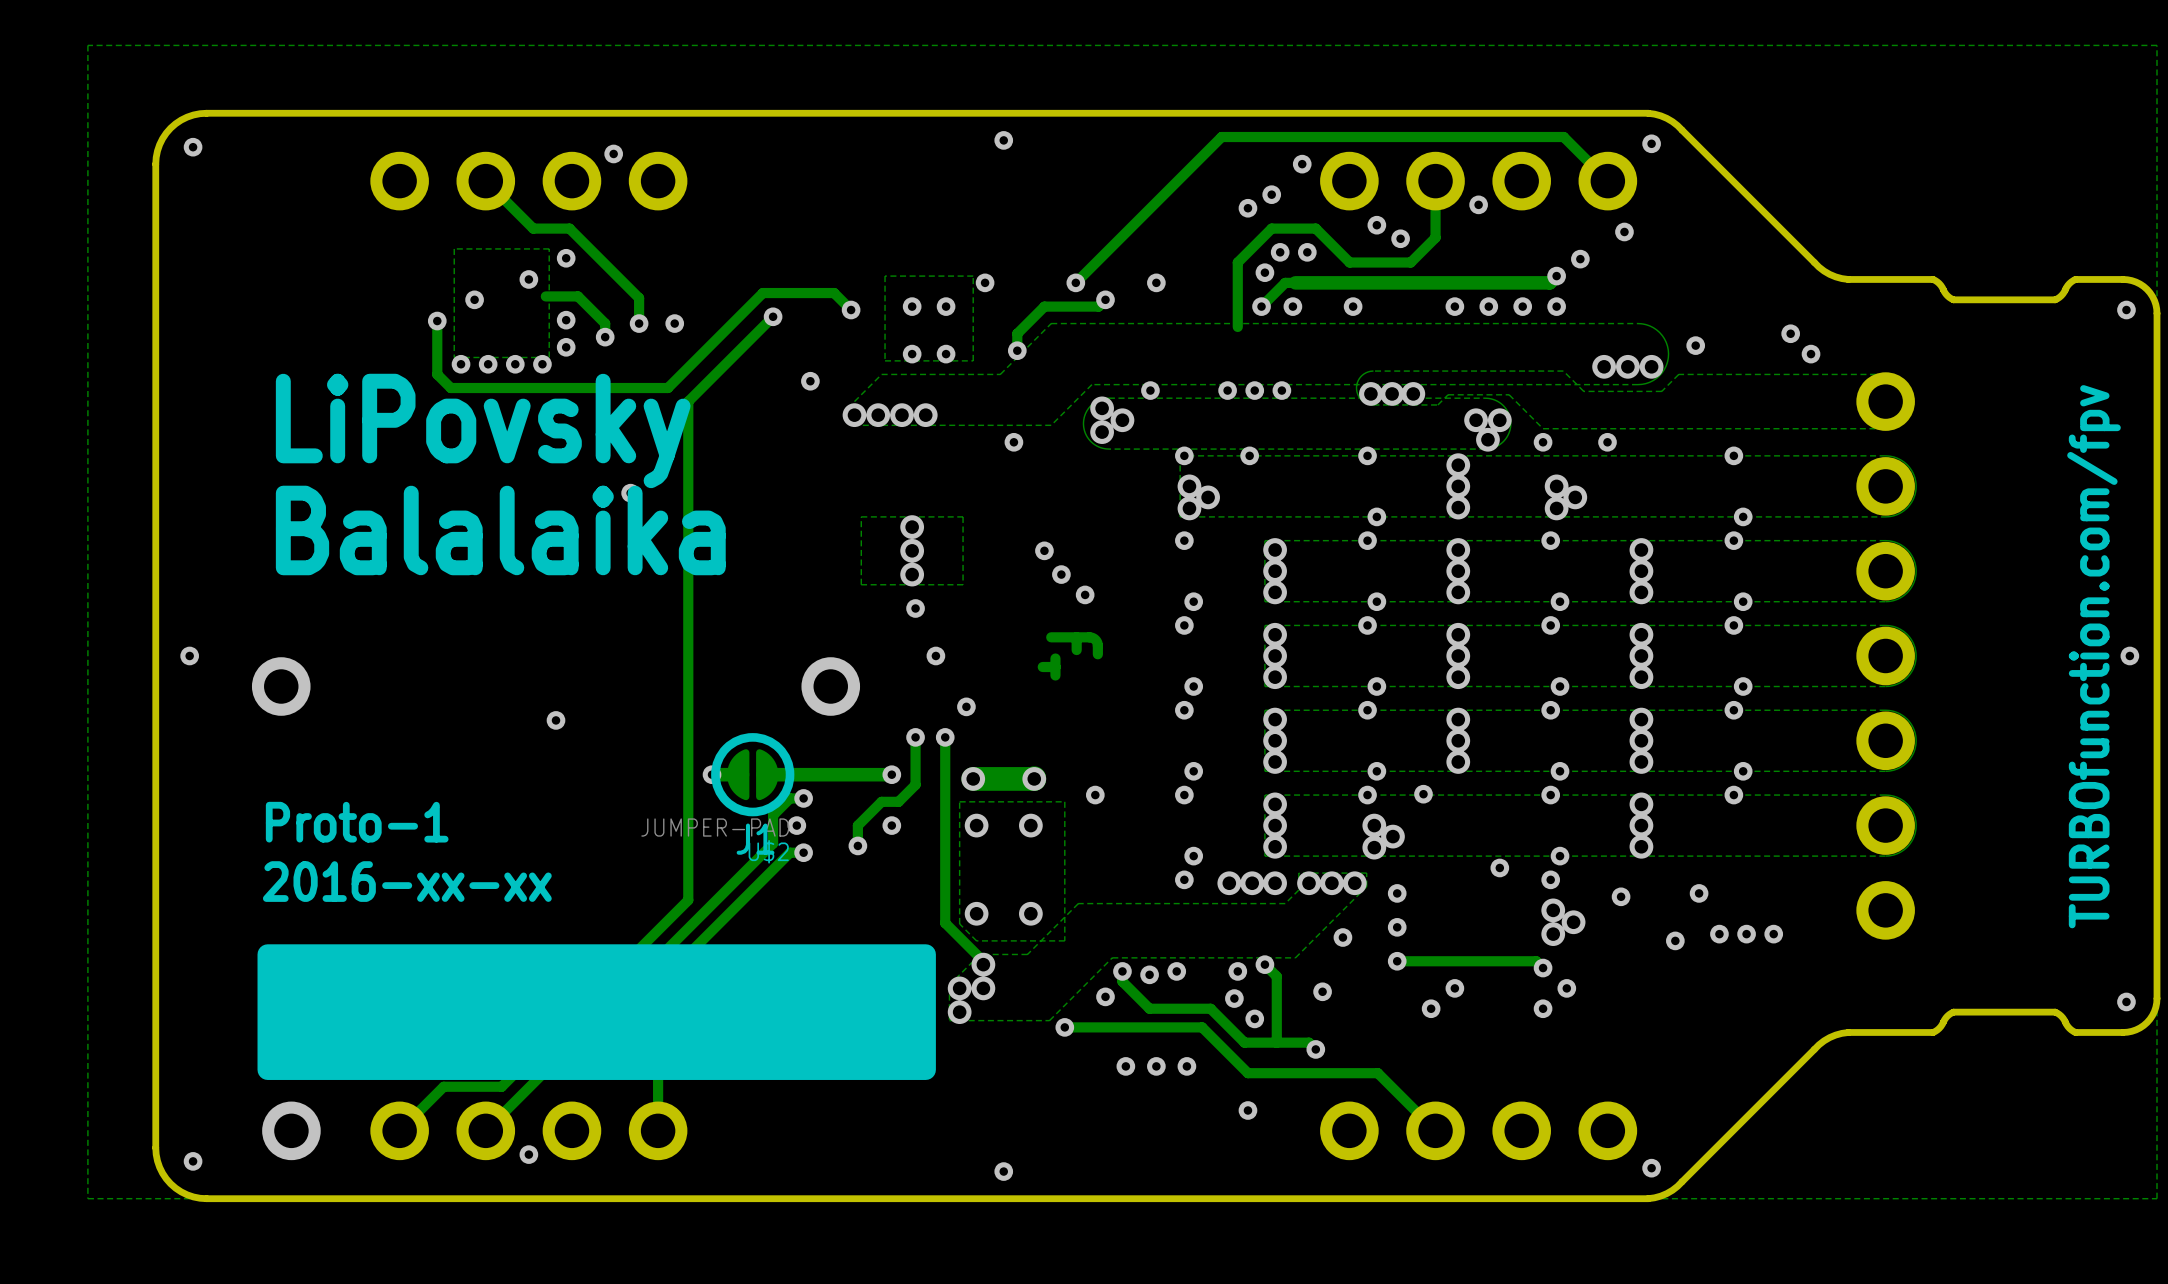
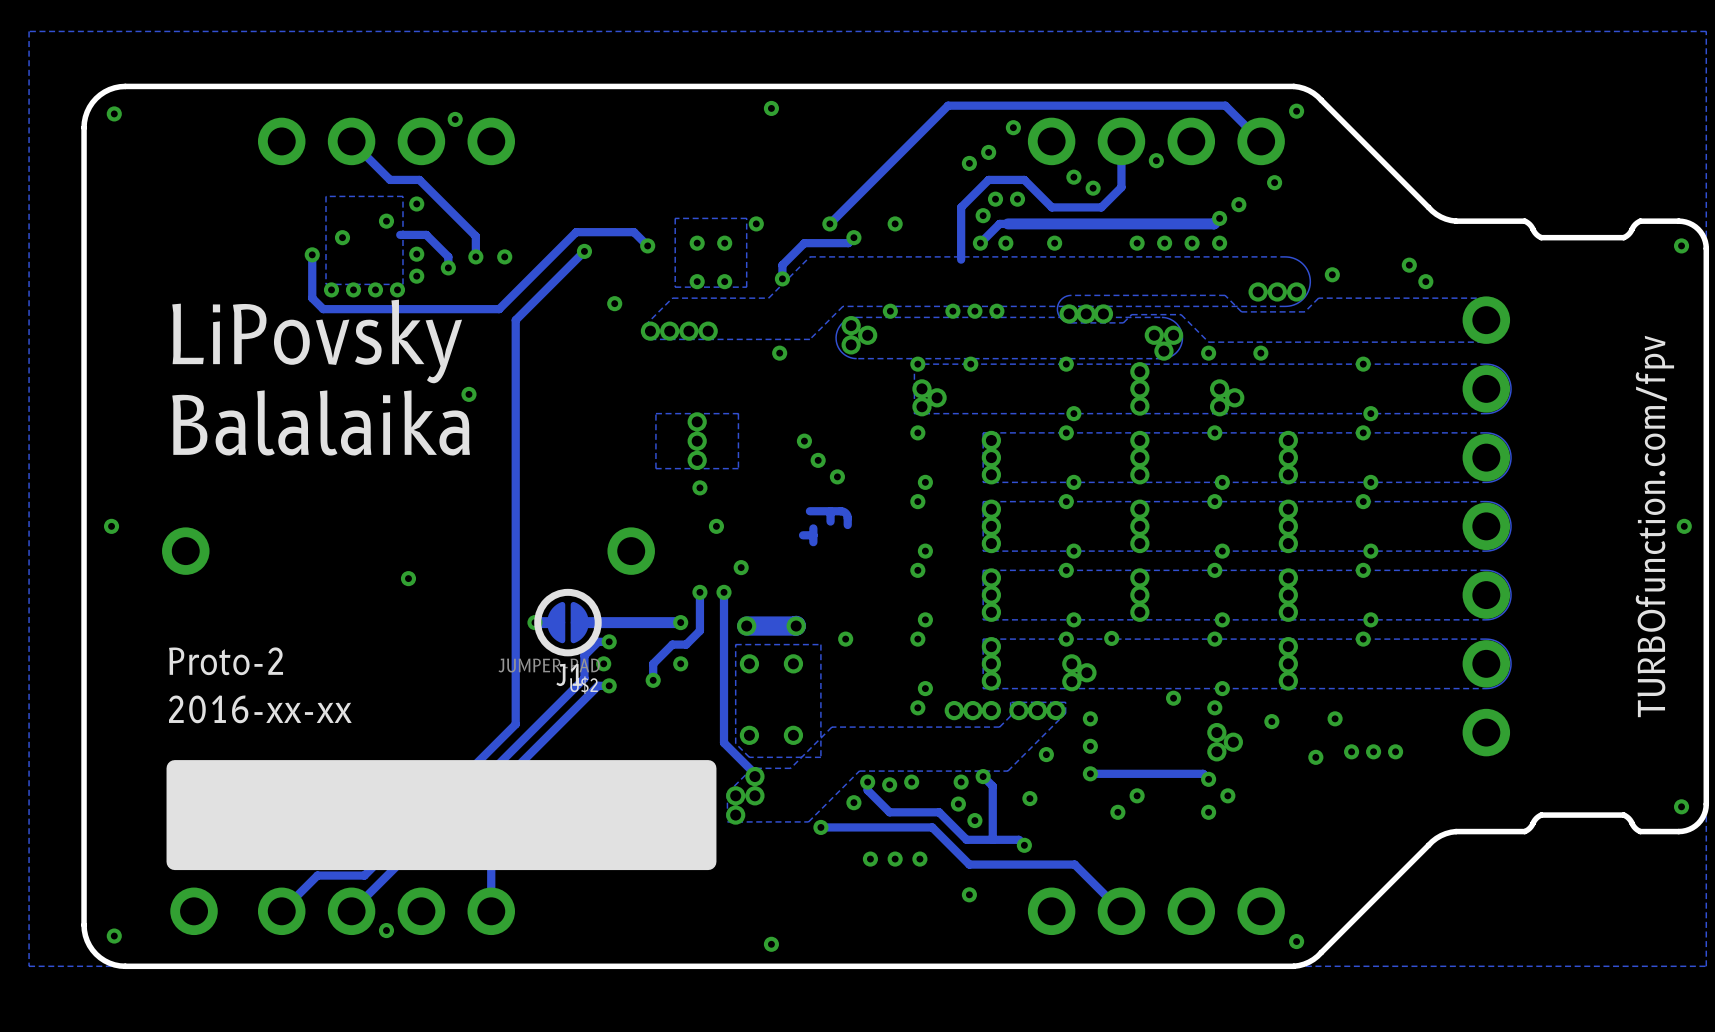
text: Proto-1 (357, 822) -> Proto-2 (226, 661)

